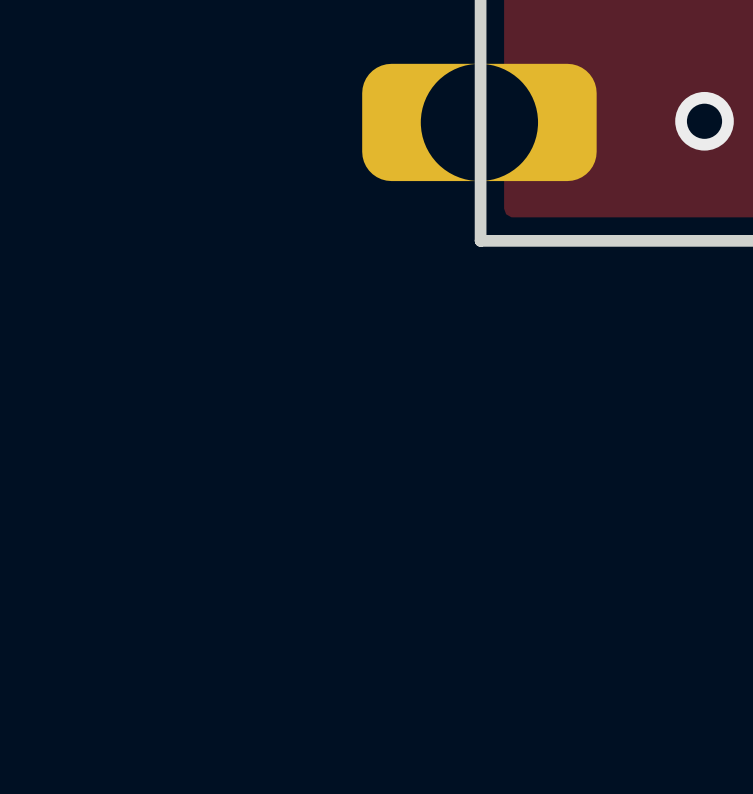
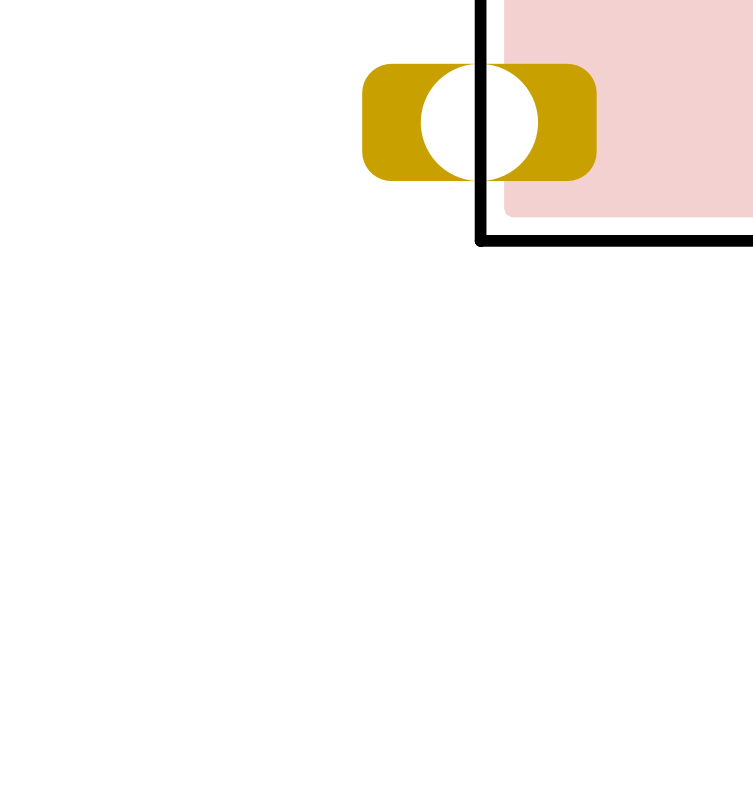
via: (704, 121) -> none

